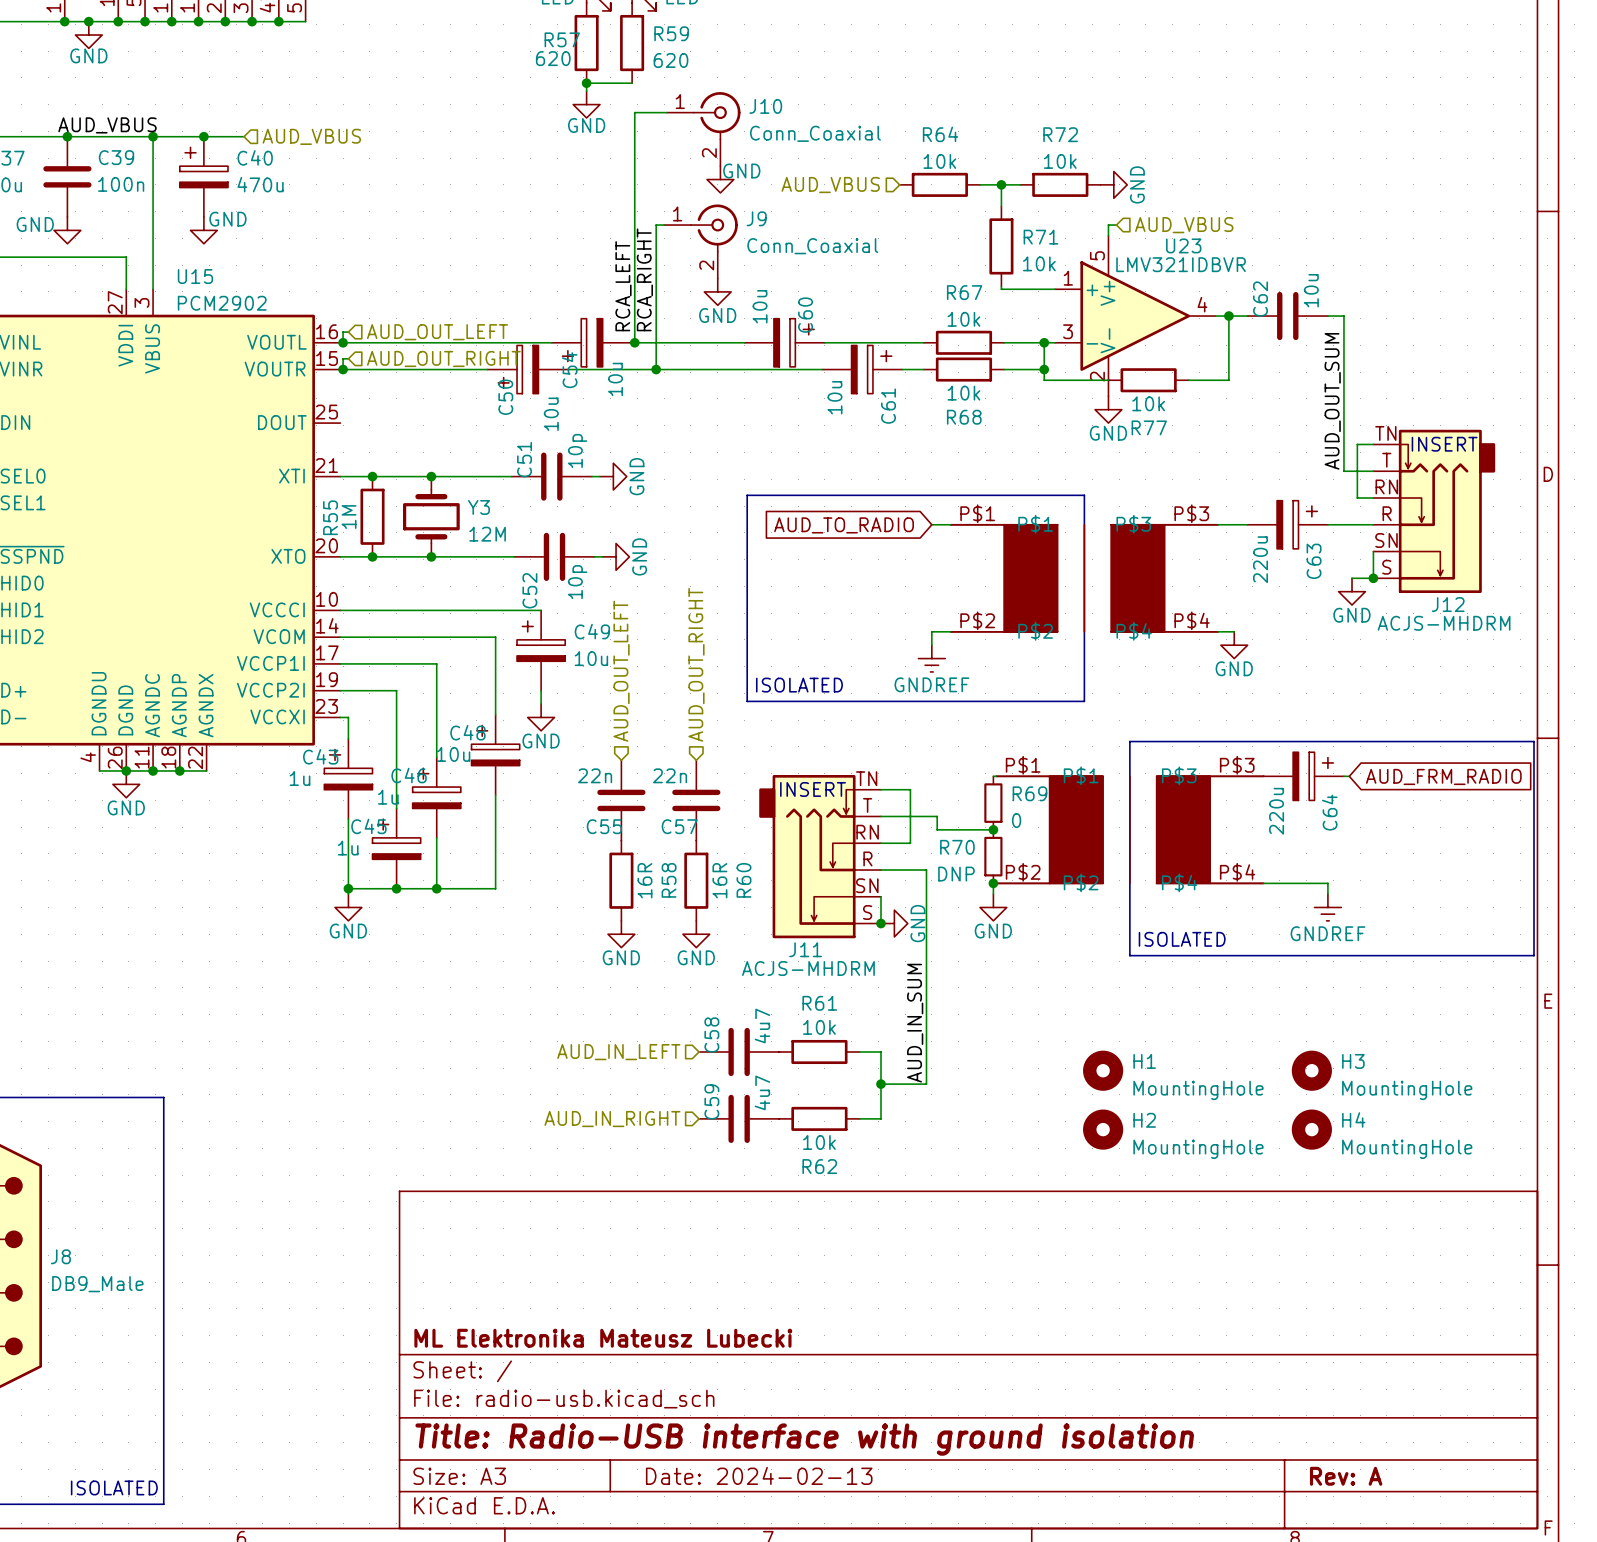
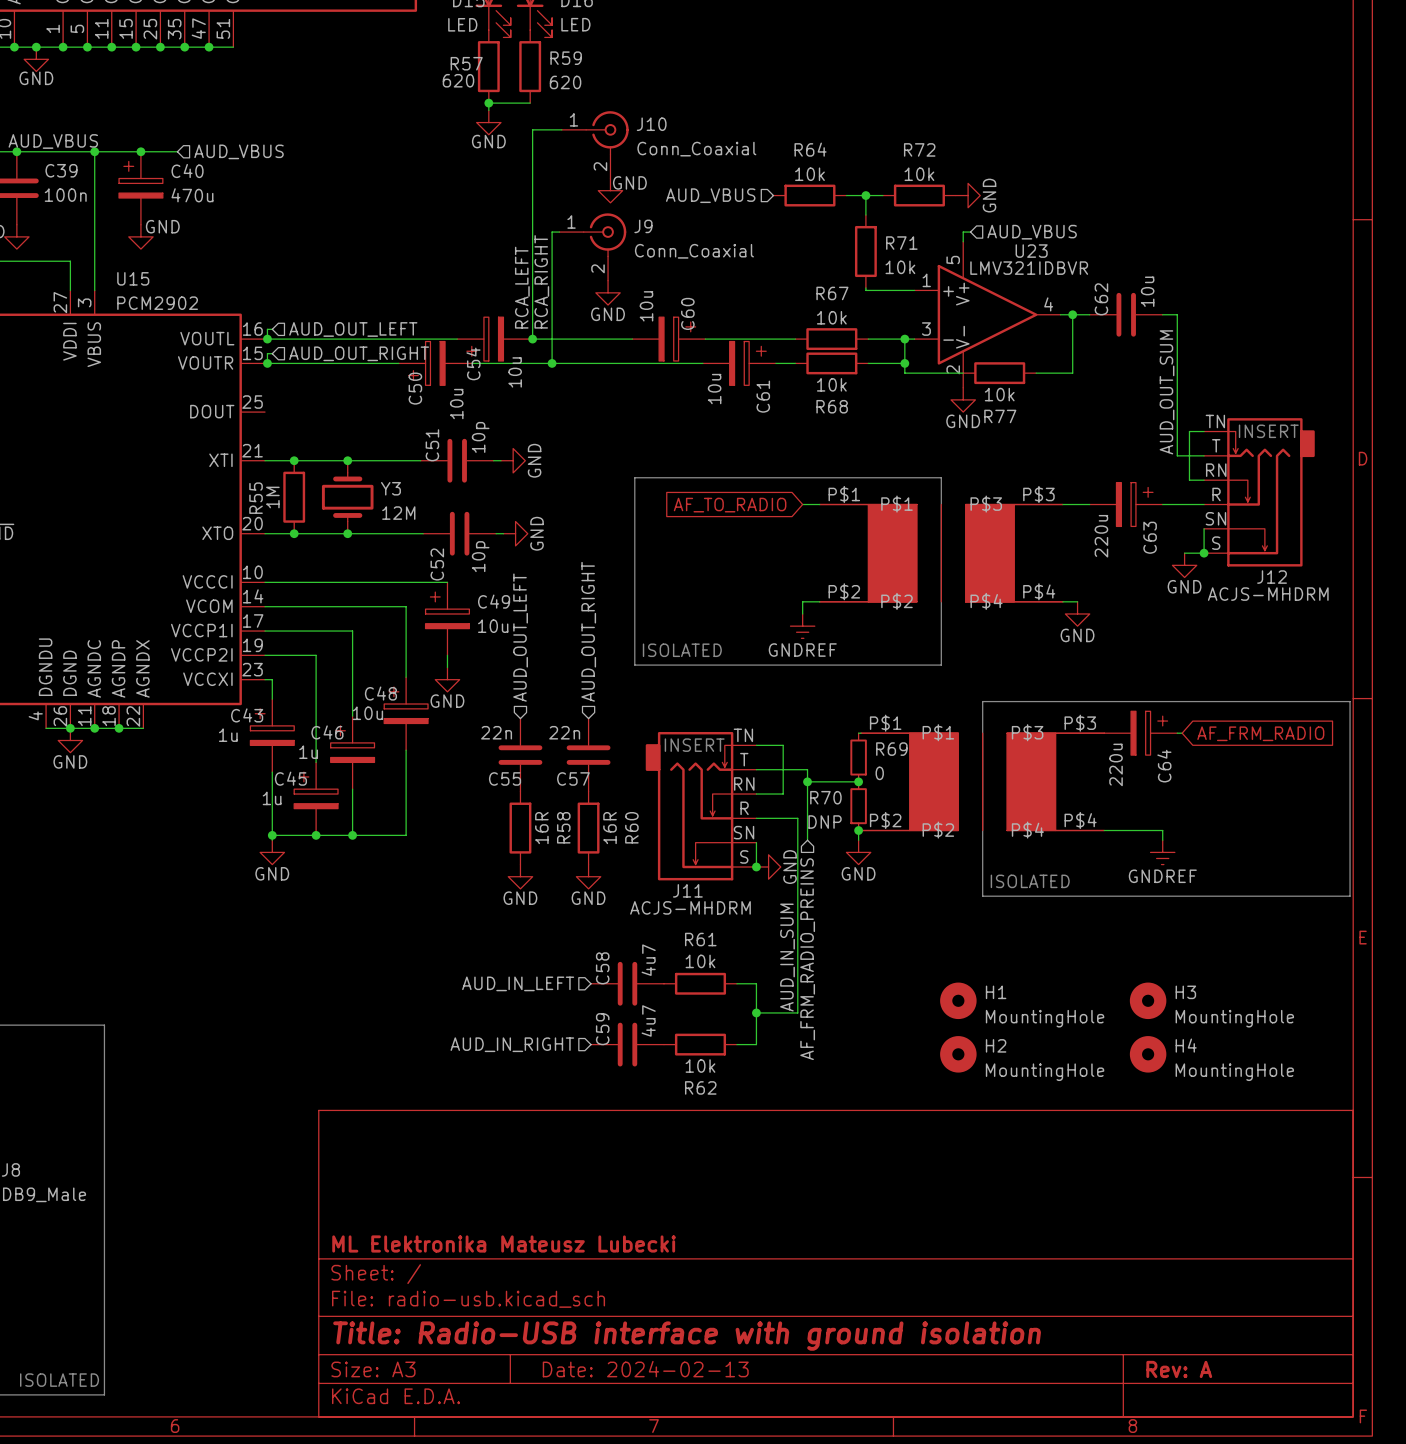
global label: AUD_TO_RADIO (844, 525) -> AF_TO_RADIO (730, 505)
global label: AUD_FRM_RADIO (1443, 776) -> AF_FRM_RADIO (1260, 733)
wire: none -> (807, 781) (807, 840)
junction: none -> (807, 781)
hierarchical label: none -> AF_FRM_RADIO_PREINS (807, 959)

